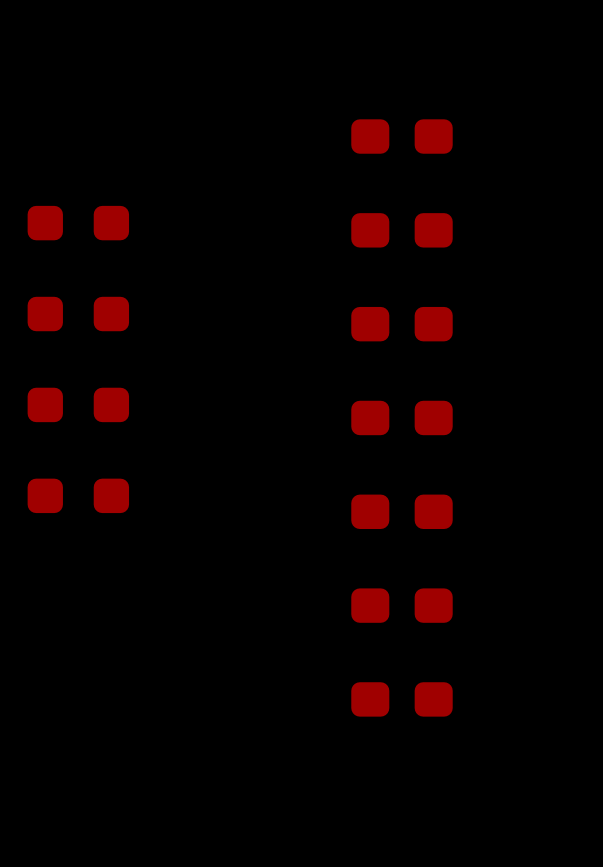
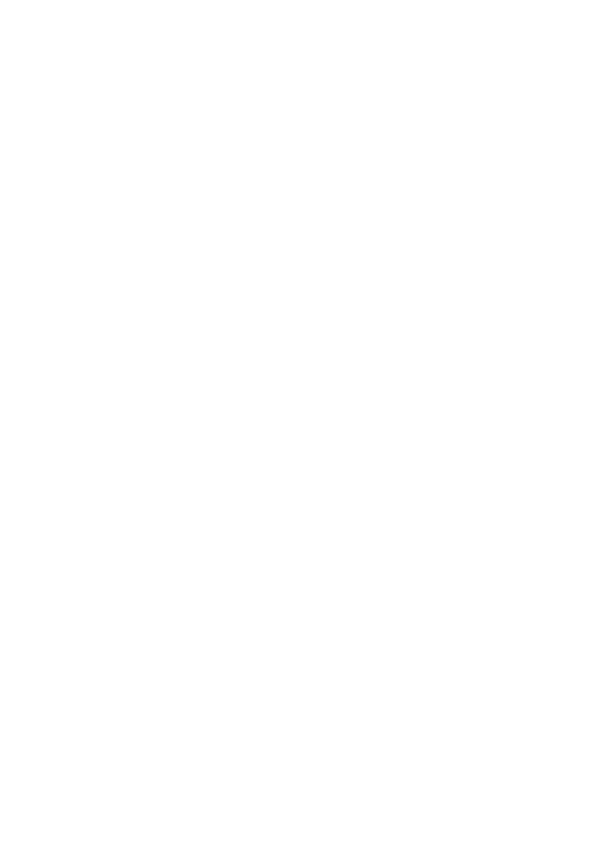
part: (401, 136) -> none
part: (78, 223) -> none
part: (401, 230) -> none
part: (78, 314) -> none
part: (401, 324) -> none
part: (78, 404) -> none
part: (401, 417) -> none
part: (78, 495) -> none
part: (401, 511) -> none
part: (401, 605) -> none
part: (401, 699) -> none

